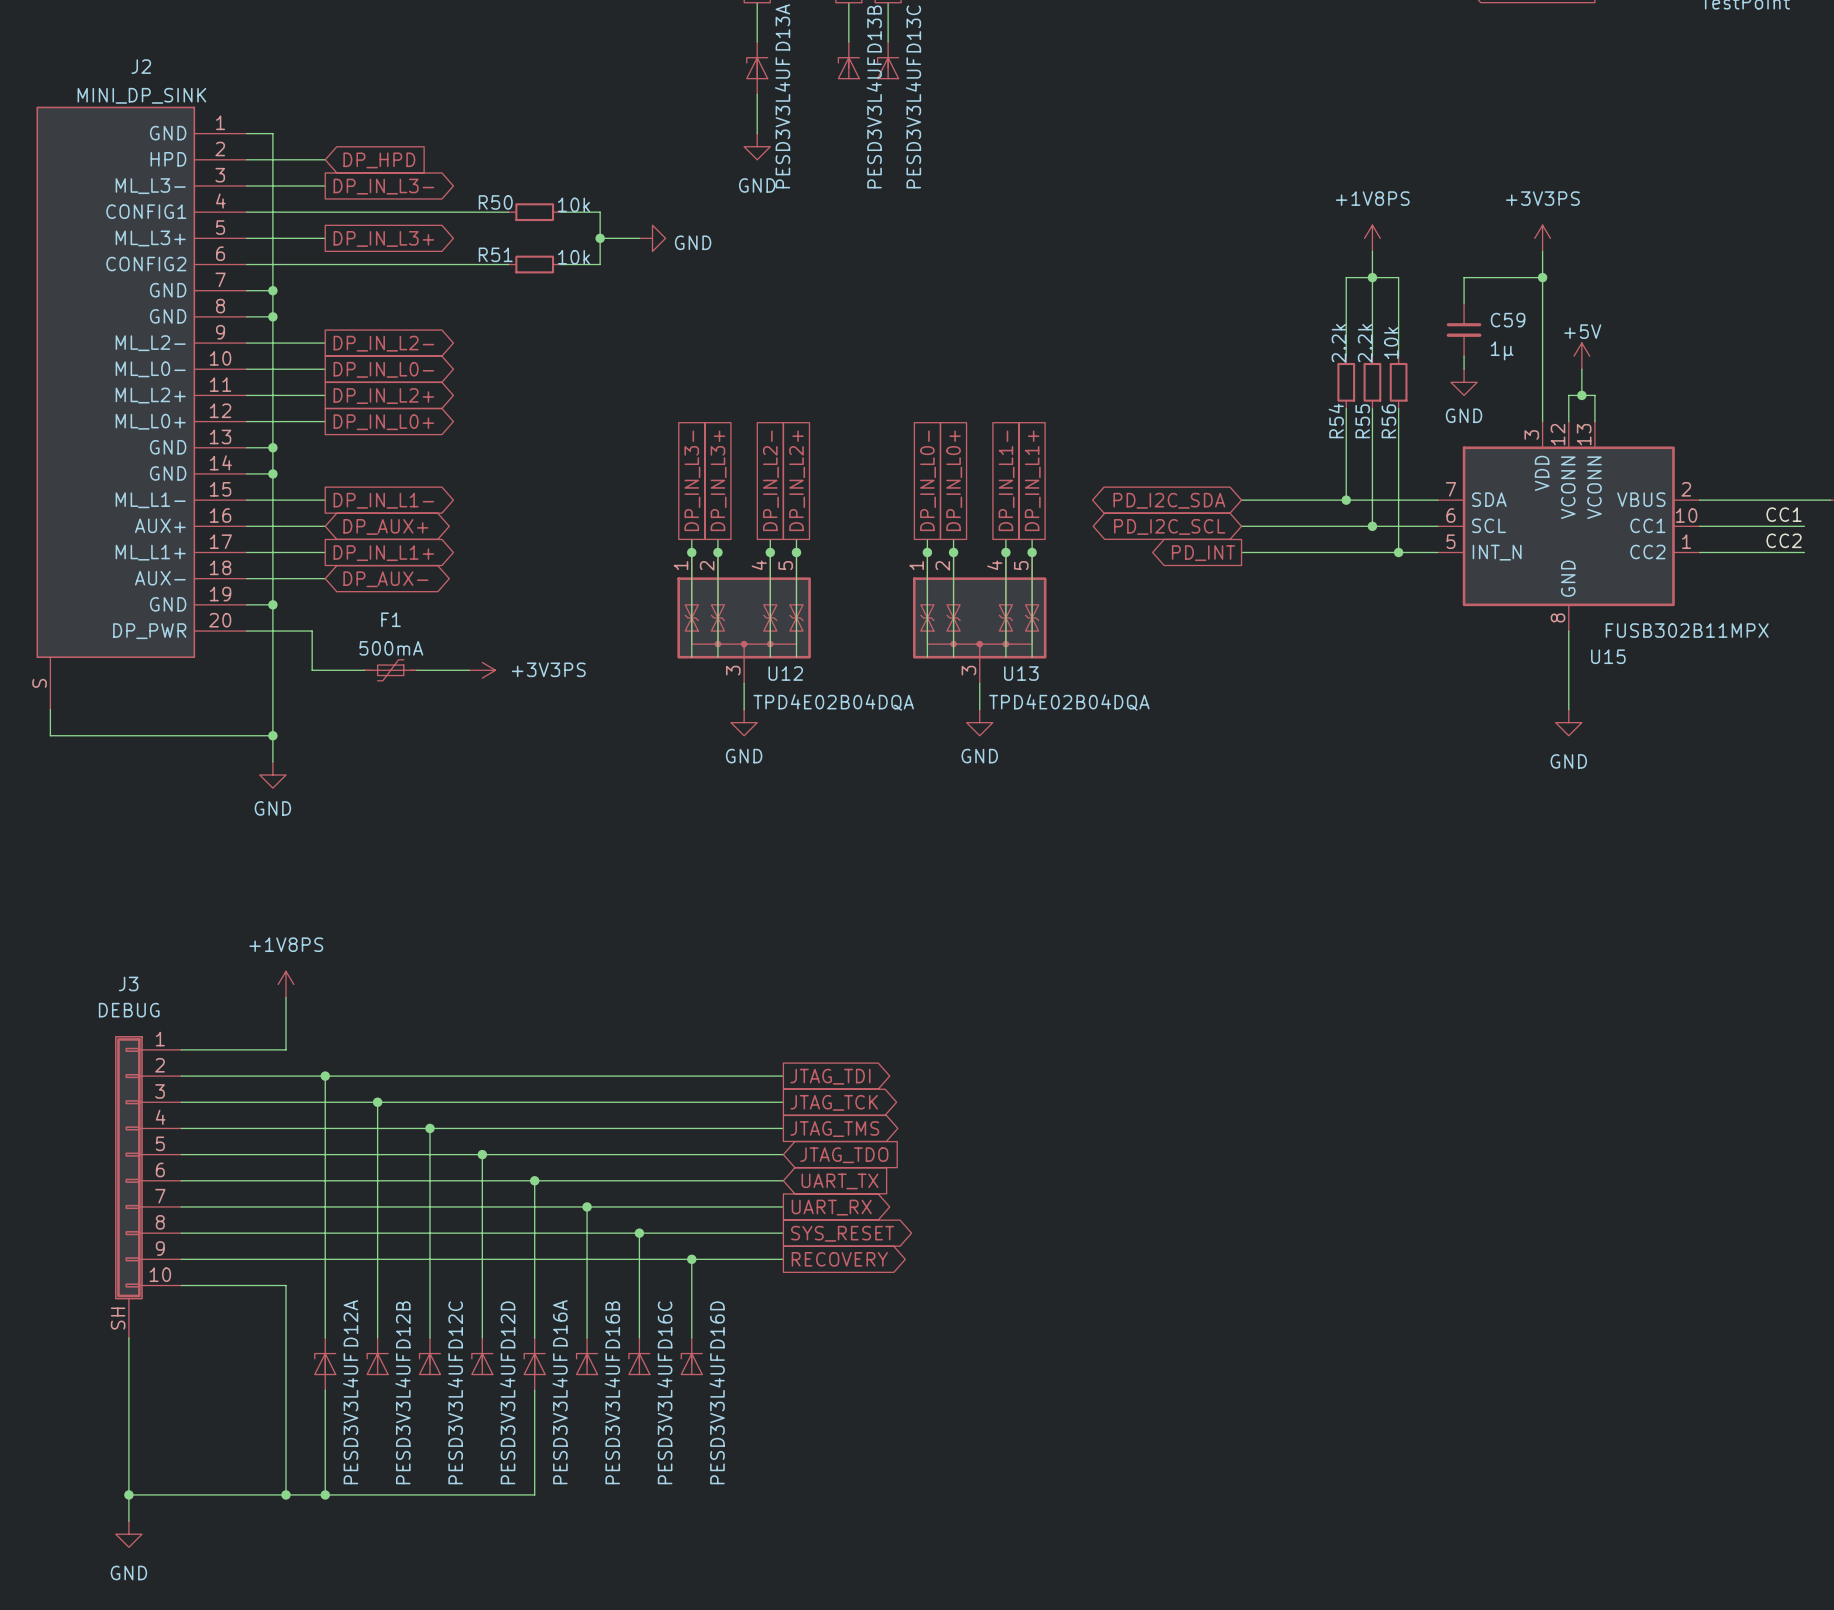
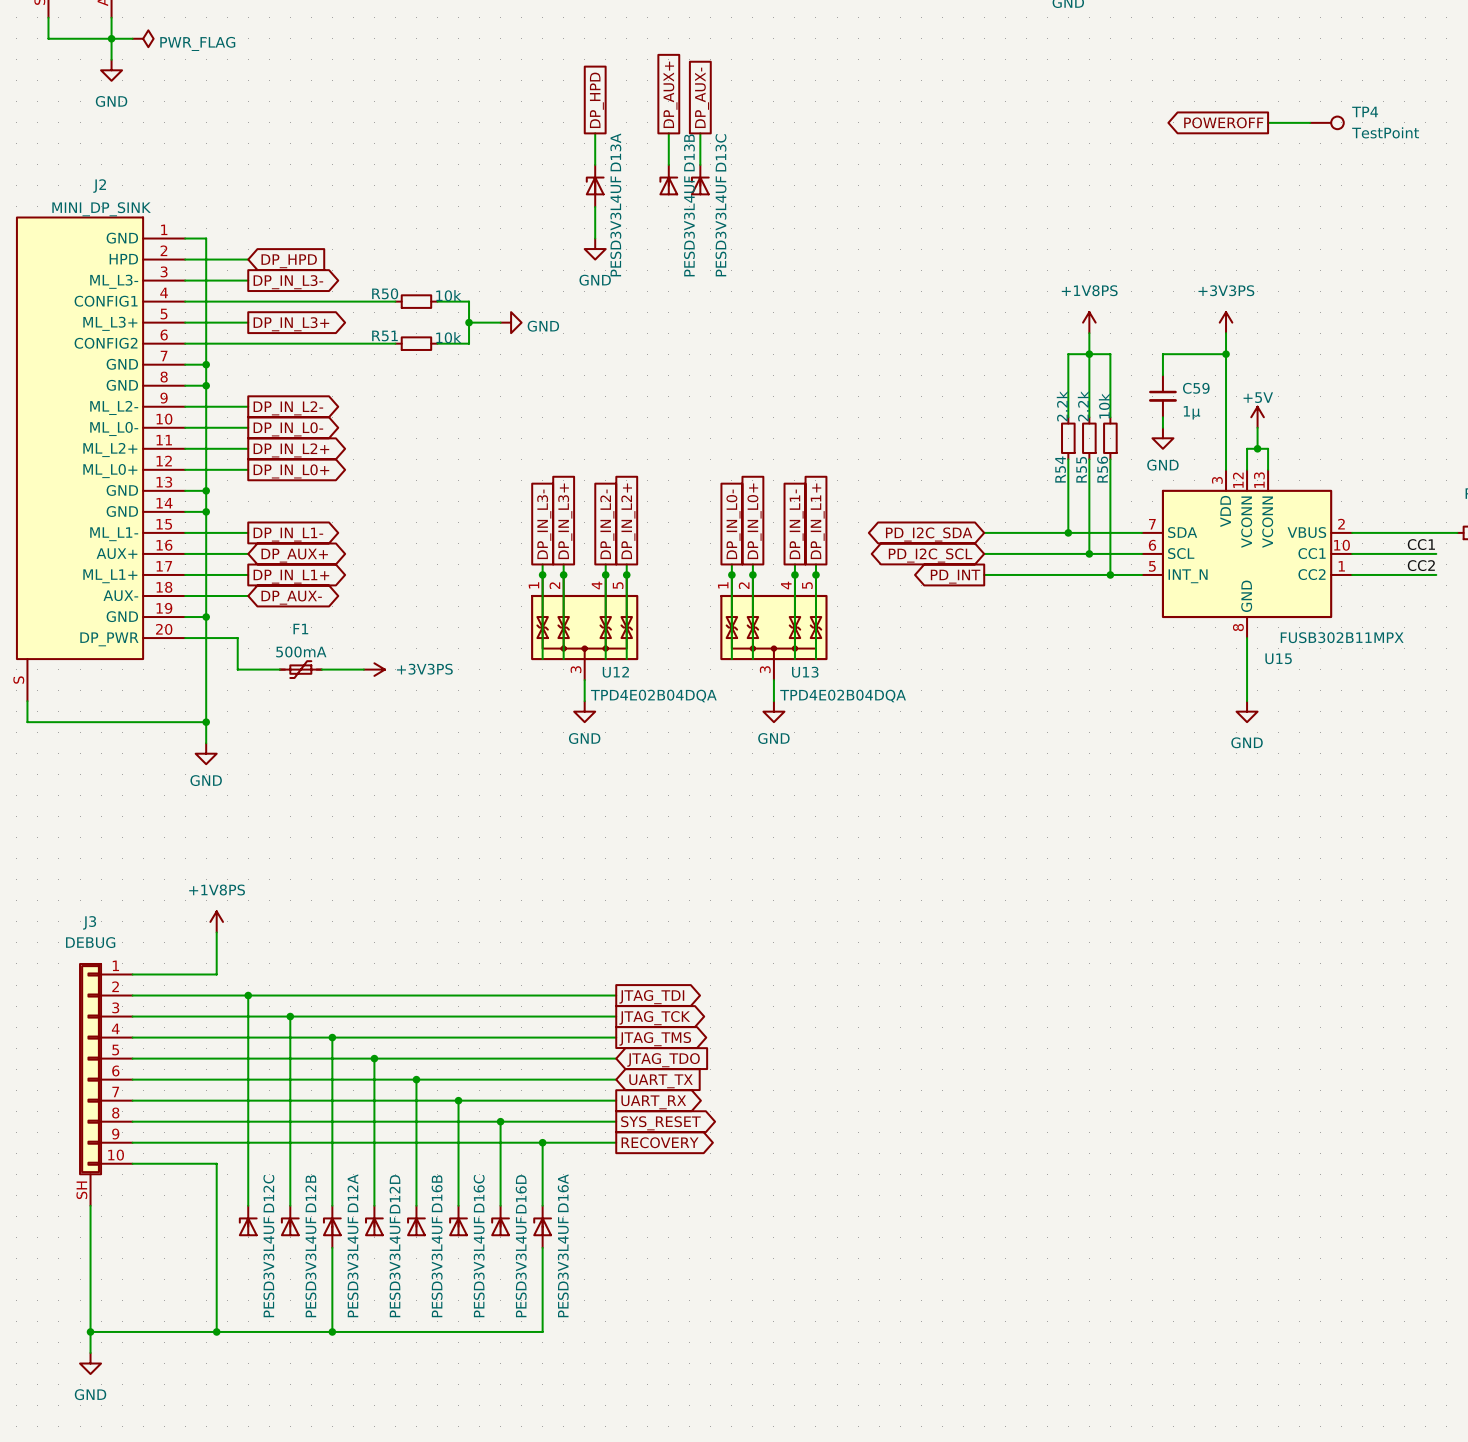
D16B name: D16B (612, 1324) -> D16C (479, 1193)
D16C name: D16C (665, 1324) -> D16D (521, 1194)
D12C position: (429, 1356) -> (248, 1220)
D16B: none -> PESD3V3L4UF (416, 1220)
D16D: PESD3V3L4UF (691, 1356) -> none
D12A position: (325, 1364) -> (332, 1226)
D16A position: (534, 1364) -> (542, 1226)
wire: (325, 1390) (325, 1494) -> (332, 1247) (332, 1331)
wire: (534, 1390) (534, 1494) -> (542, 1247) (542, 1331) (416, 1331)
junction: (325, 1494) -> none
junction: none -> (332, 1331)

